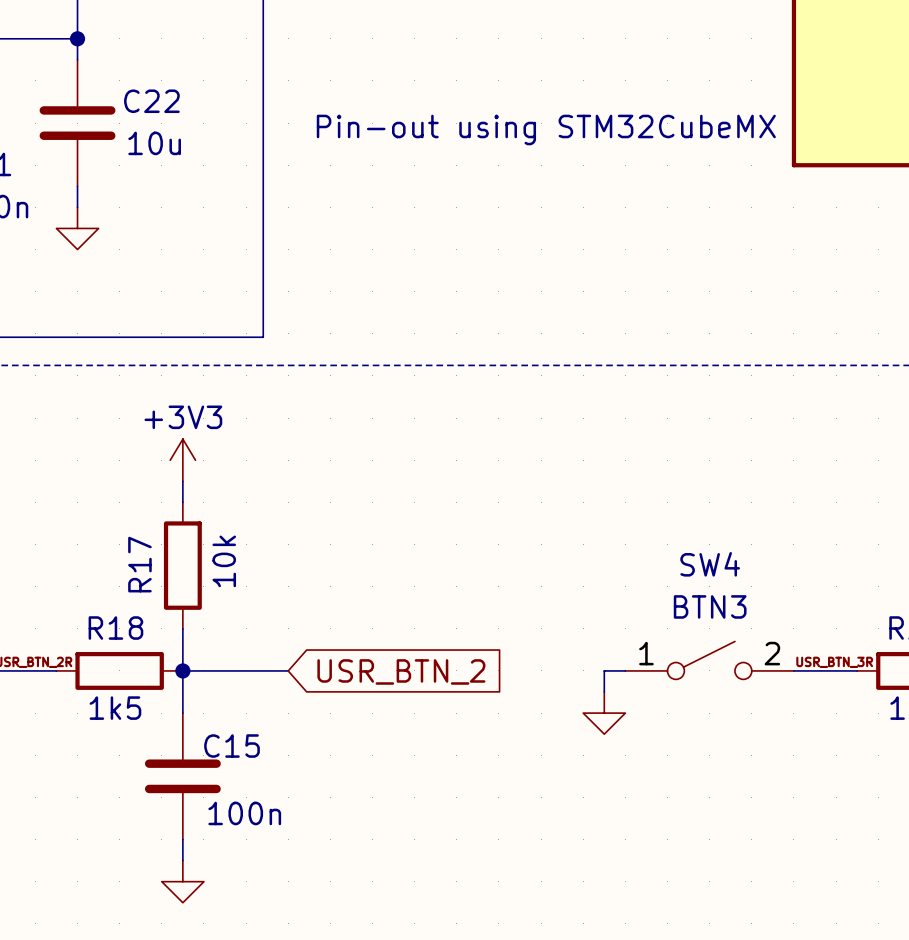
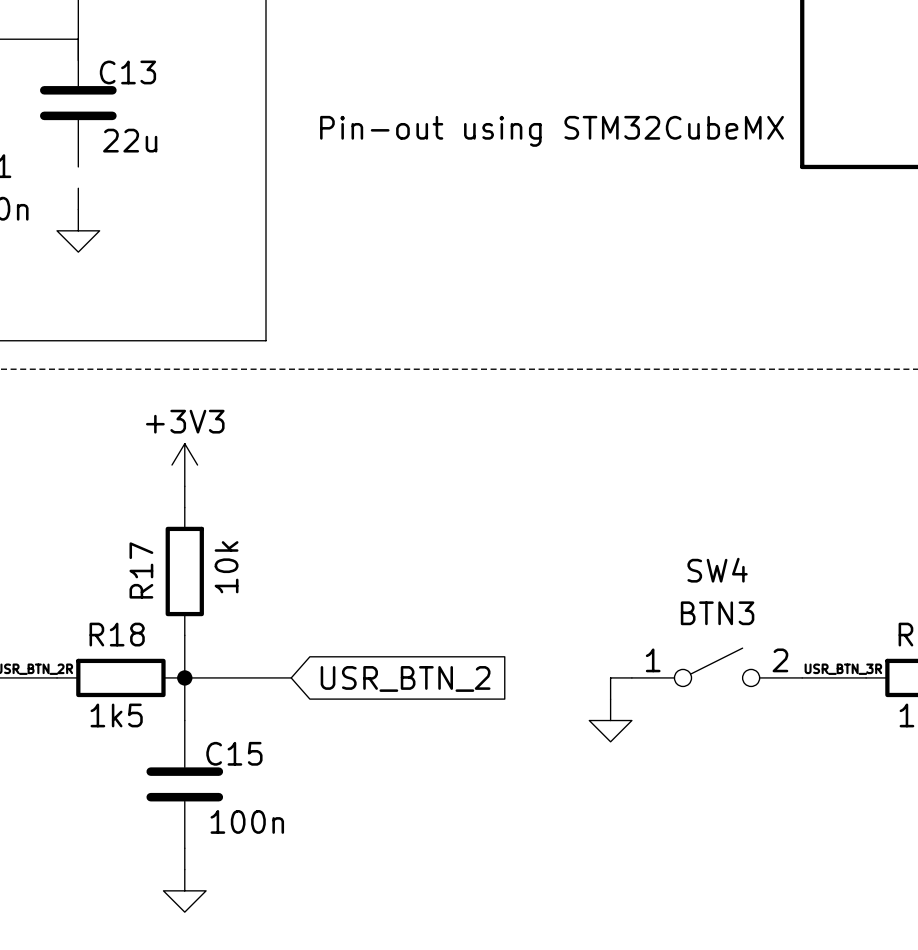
junction: (77, 38) -> none
C13: none -> 22u (78, 103)
C22: 10u (77, 123) -> none

